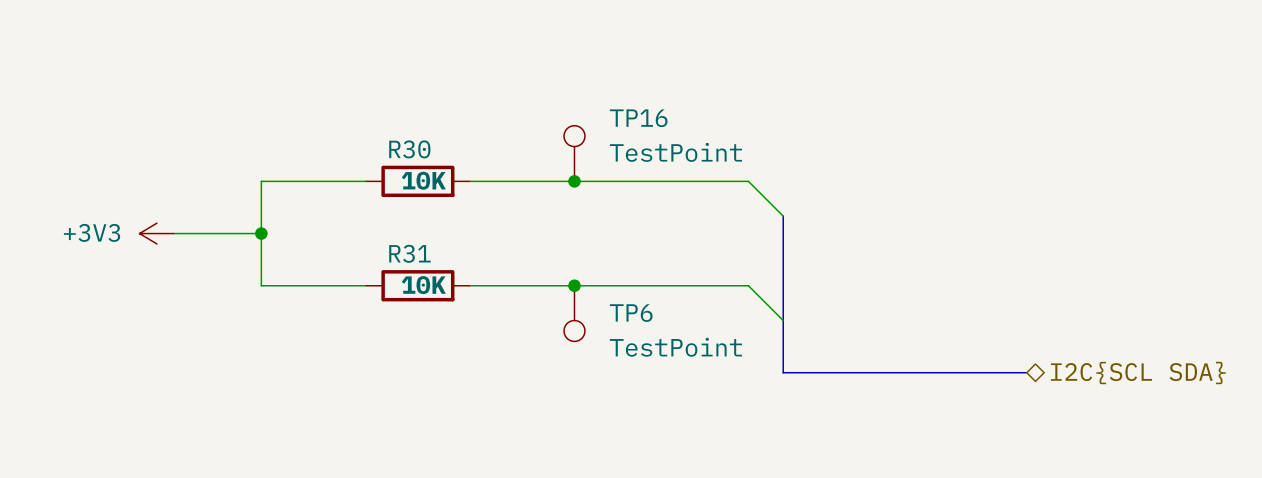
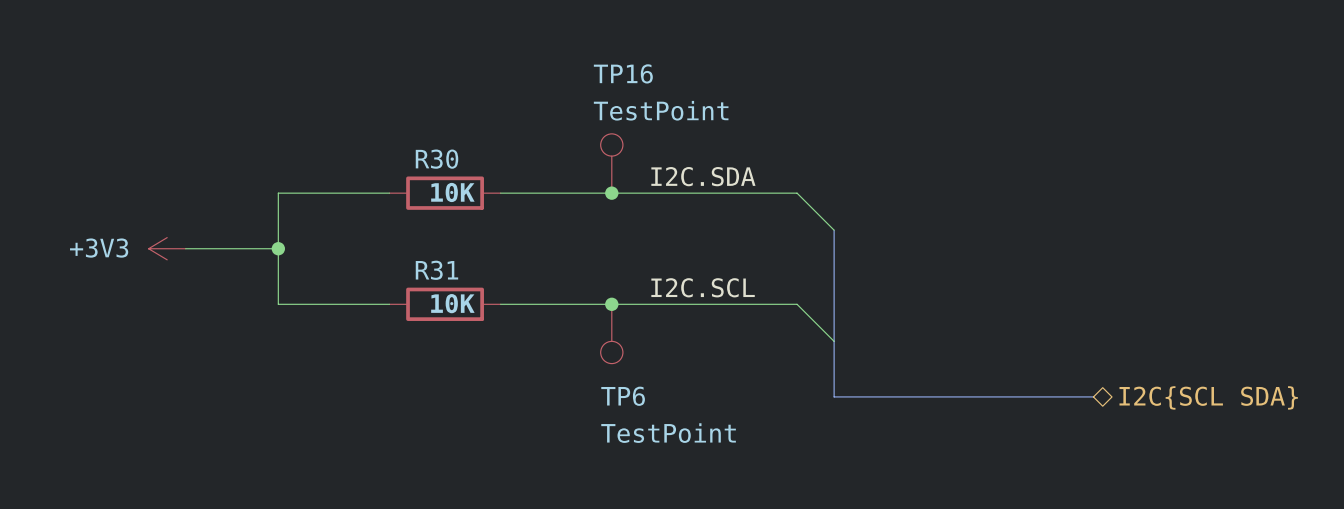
TP16 name position: TP16 (638, 118) -> TP16 (623, 73)
TP16 value position: TestPoint (675, 152) -> TestPoint (661, 110)
label: none -> I2C.SDA (703, 176)
label: none -> I2C.SCL (703, 287)
TP6 name position: TP6 (631, 313) -> TP6 (623, 396)
TP6 value position: TestPoint (675, 347) -> TestPoint (668, 433)

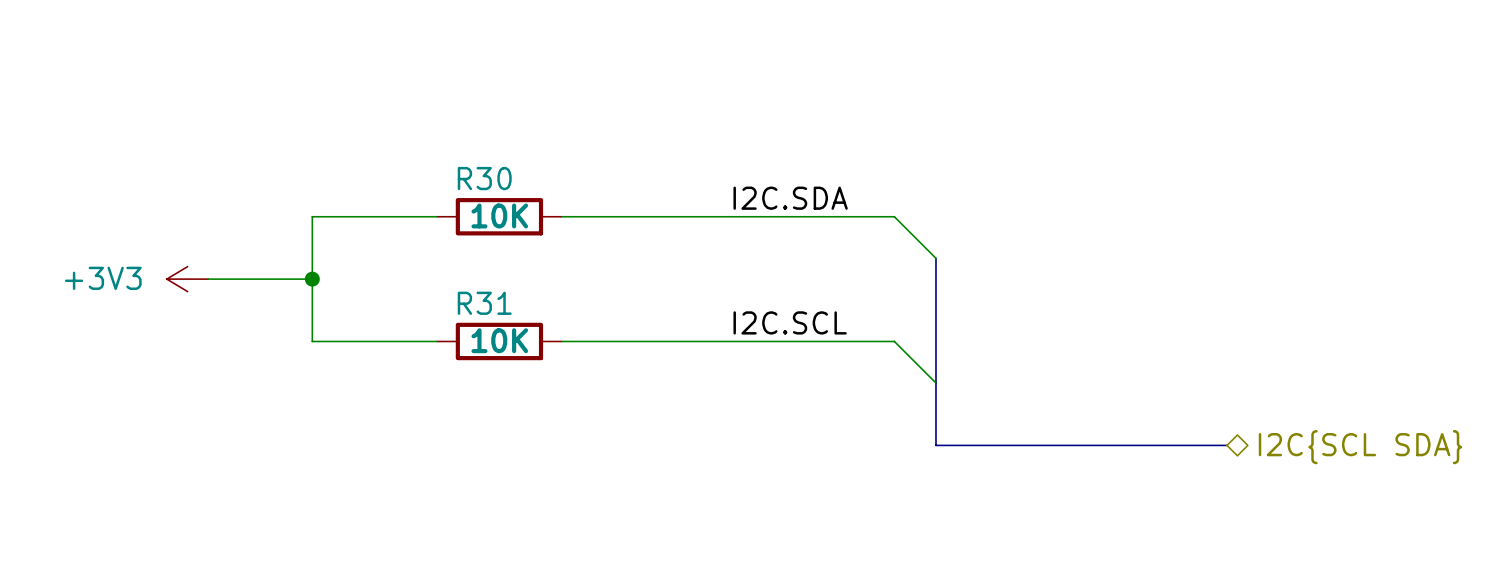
TP16: TestPoint (611, 163) -> none
junction: (611, 193) -> none
junction: (611, 304) -> none
TP6: TestPoint (611, 333) -> none

